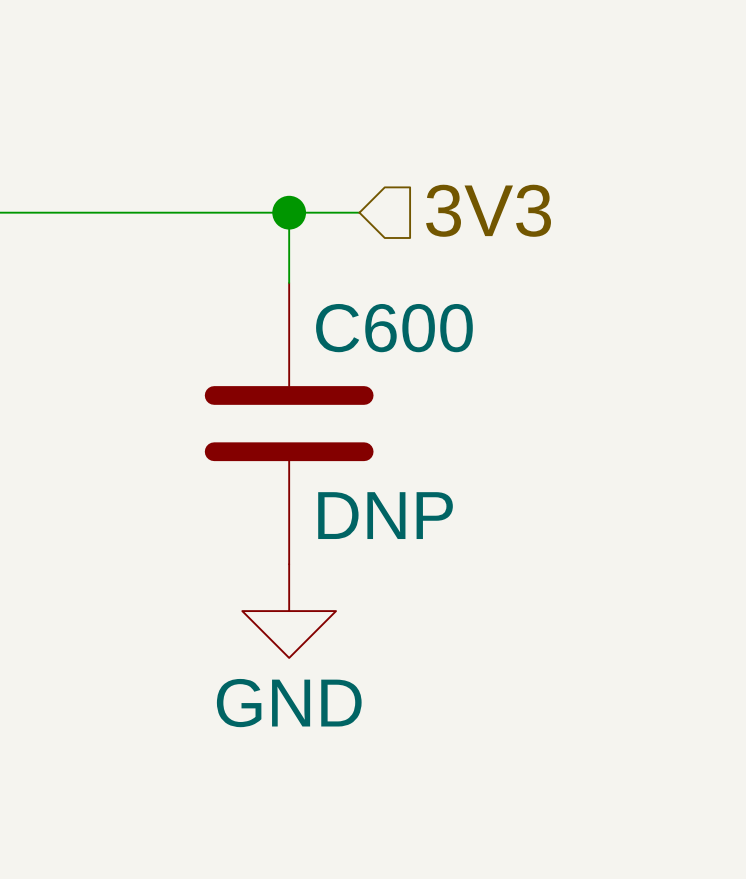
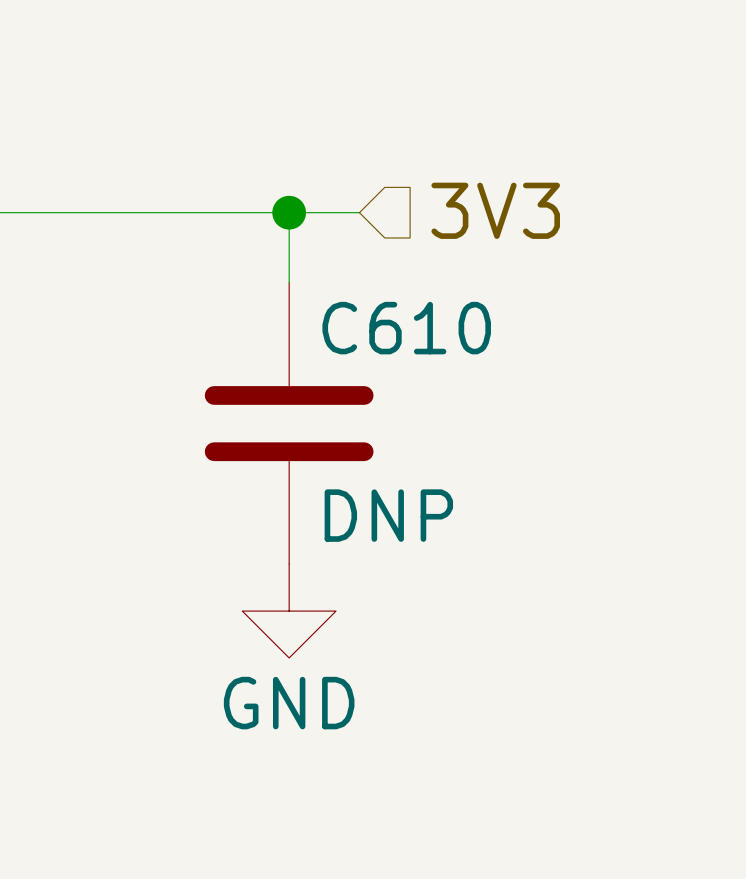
C600 name: C600 (394, 328) -> C610 (406, 328)

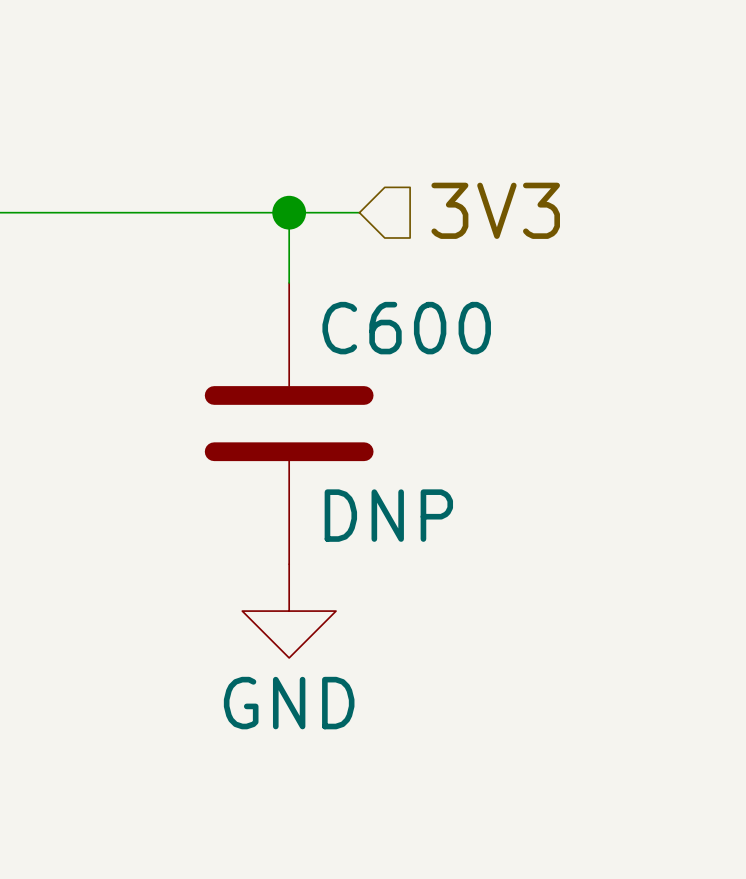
C610 name: C610 (406, 328) -> C600 (406, 328)

